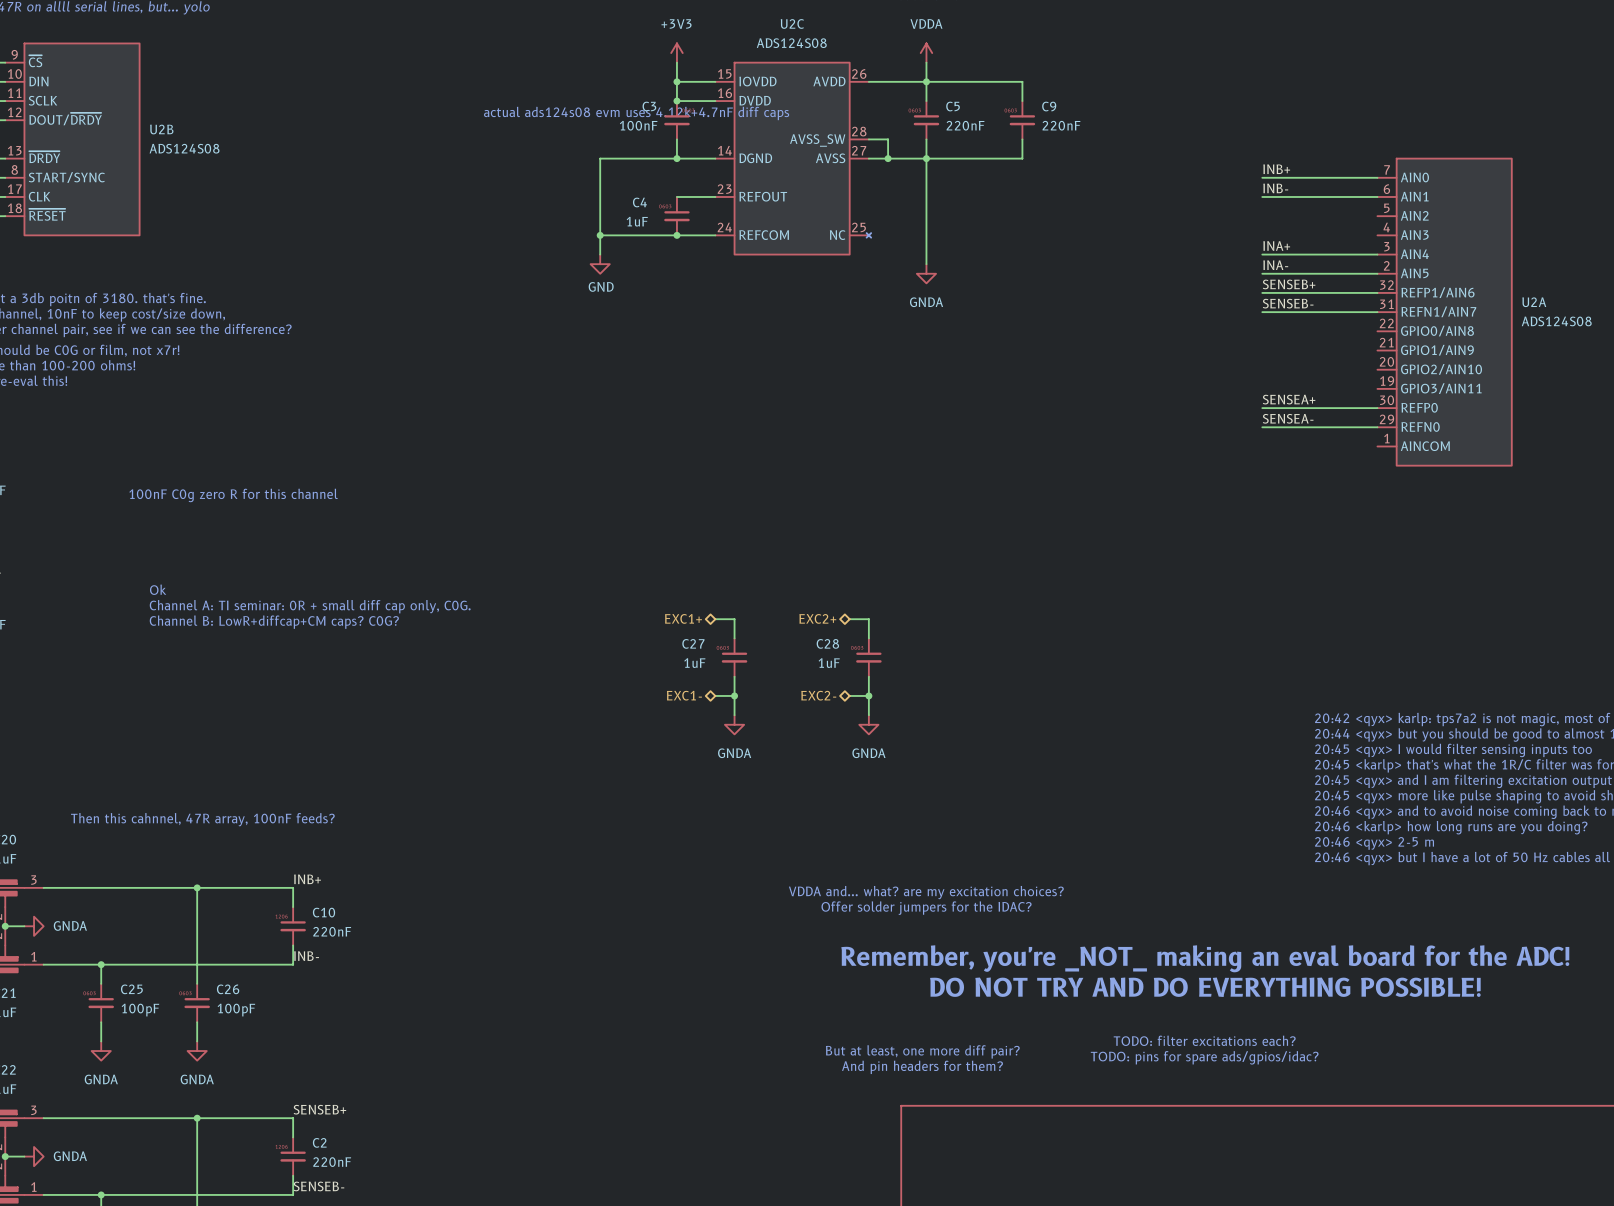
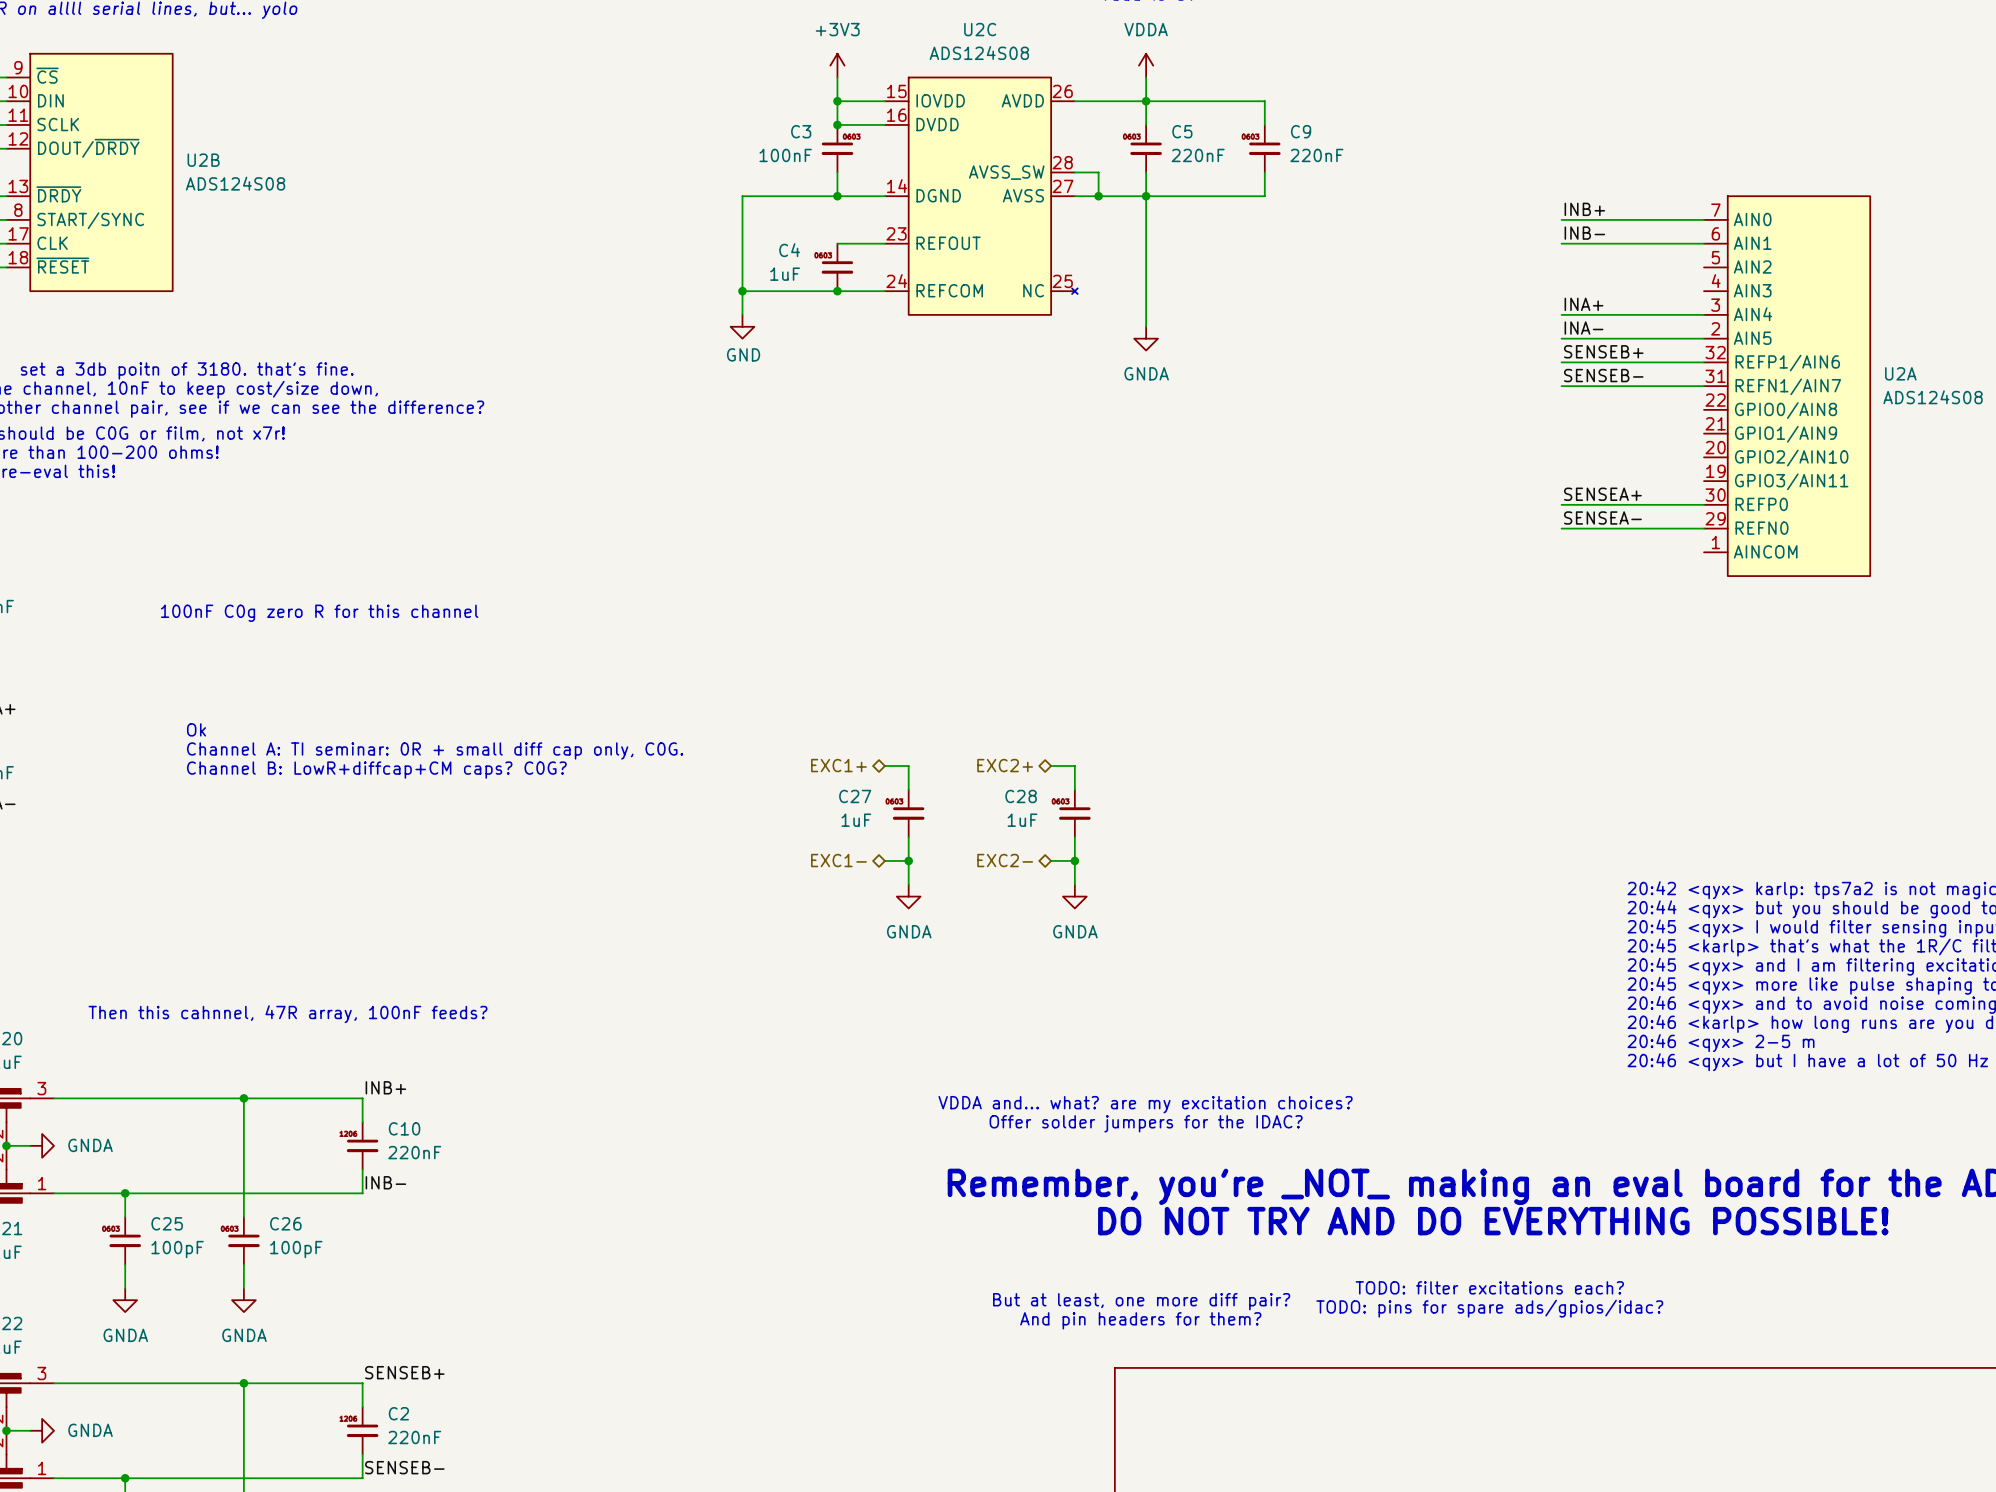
text: actual ads124s08 evm uses 4.12k+4.7nF diff caps (636, 113) -> none

